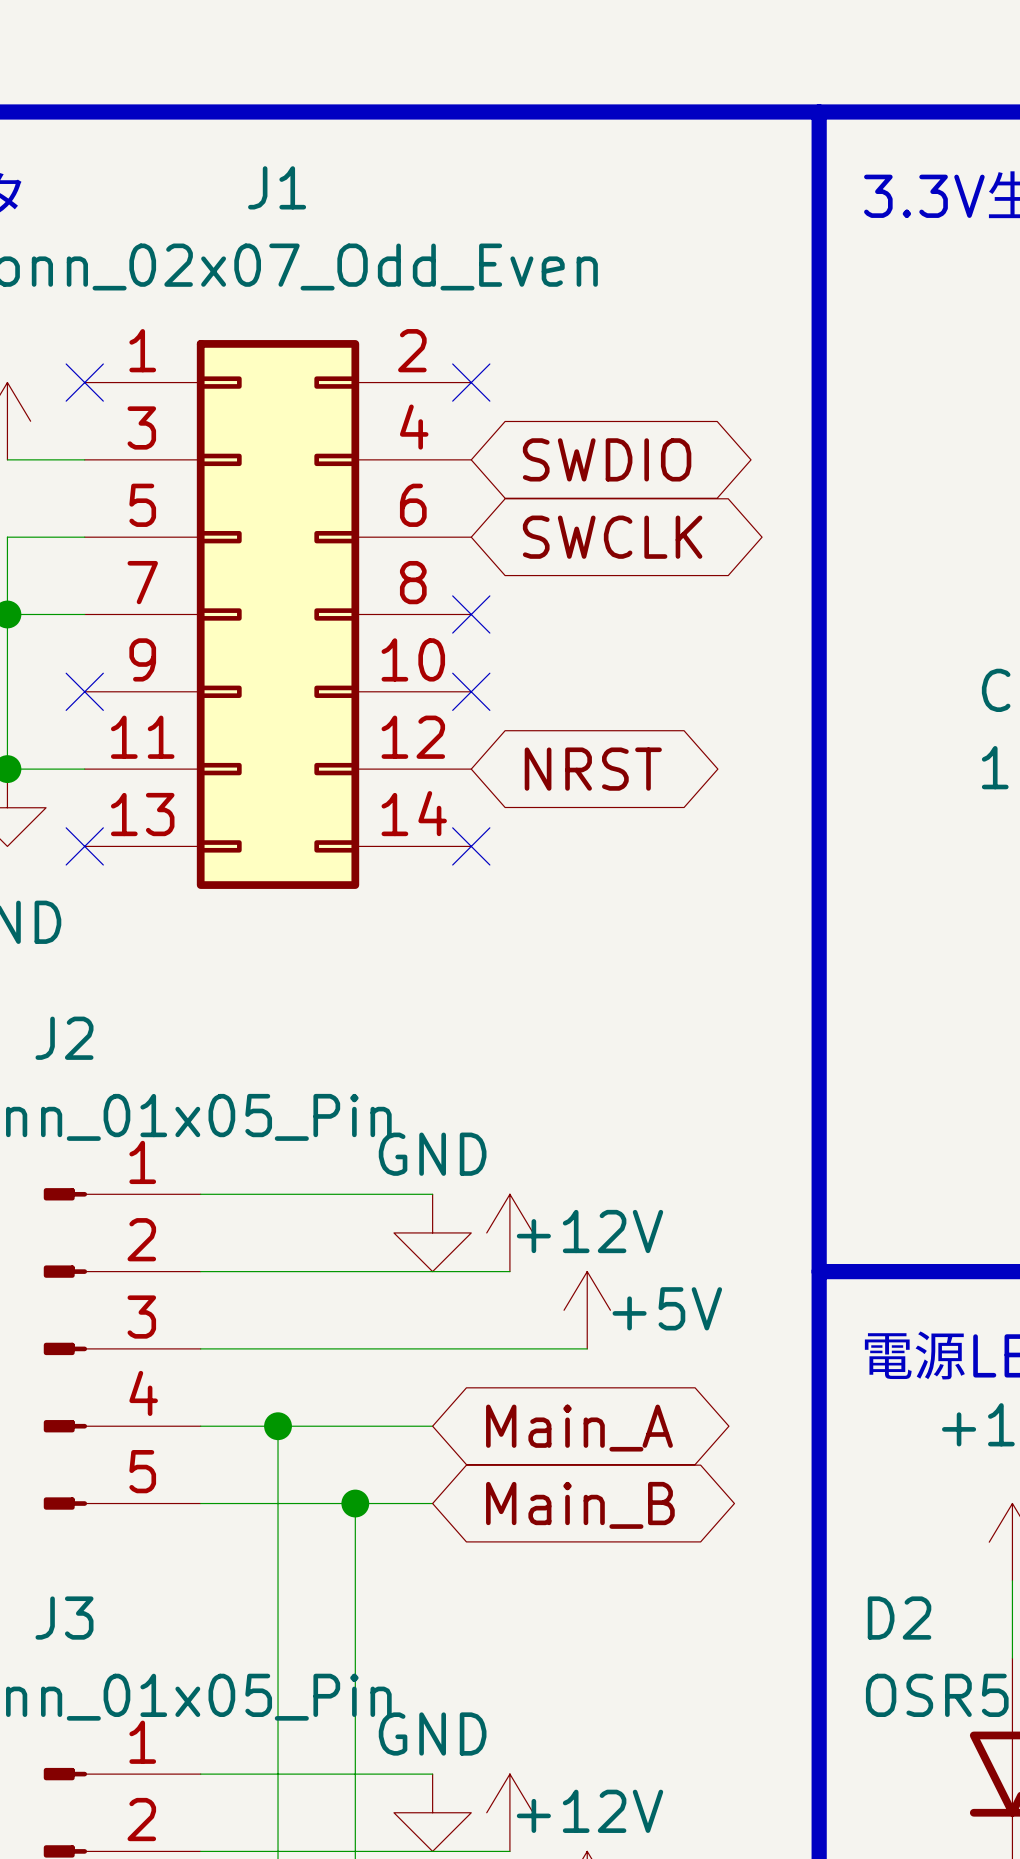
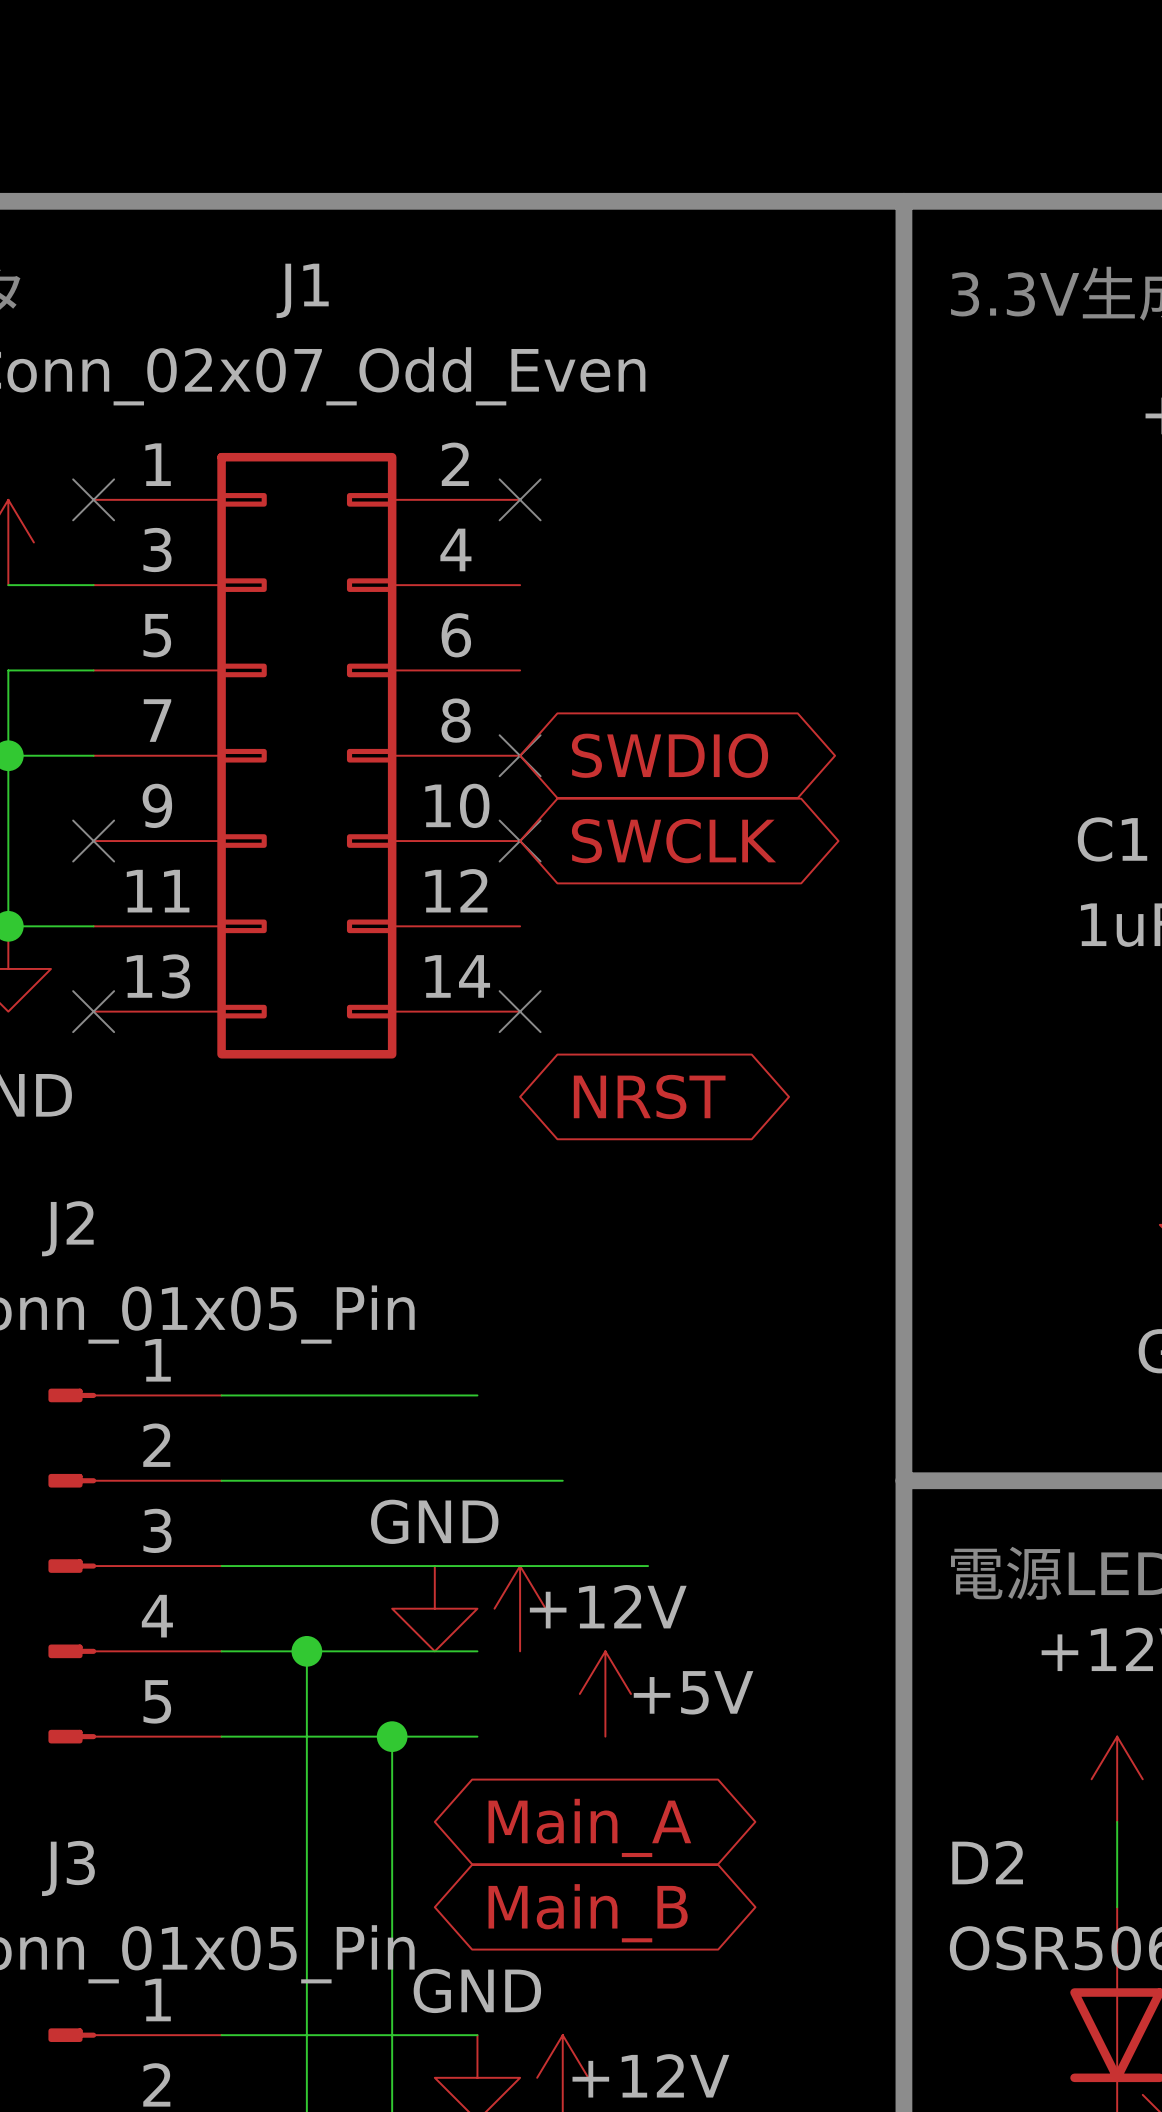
global label position: SWDIO (607, 459) -> SWDIO (670, 755)
global label position: SWCLK (612, 537) -> SWCLK (674, 841)
global label position: NRST (593, 769) -> NRST (649, 1096)
power symbol position: GND (432, 1232) -> GND (434, 1608)
power symbol position: +12V (509, 1232) -> +12V (520, 1608)
power symbol position: +5V (587, 1310) -> +5V (605, 1693)
global label position: Main_A (579, 1428) -> Main_A (589, 1827)
global label position: Main_B (580, 1505) -> Main_B (588, 1913)

